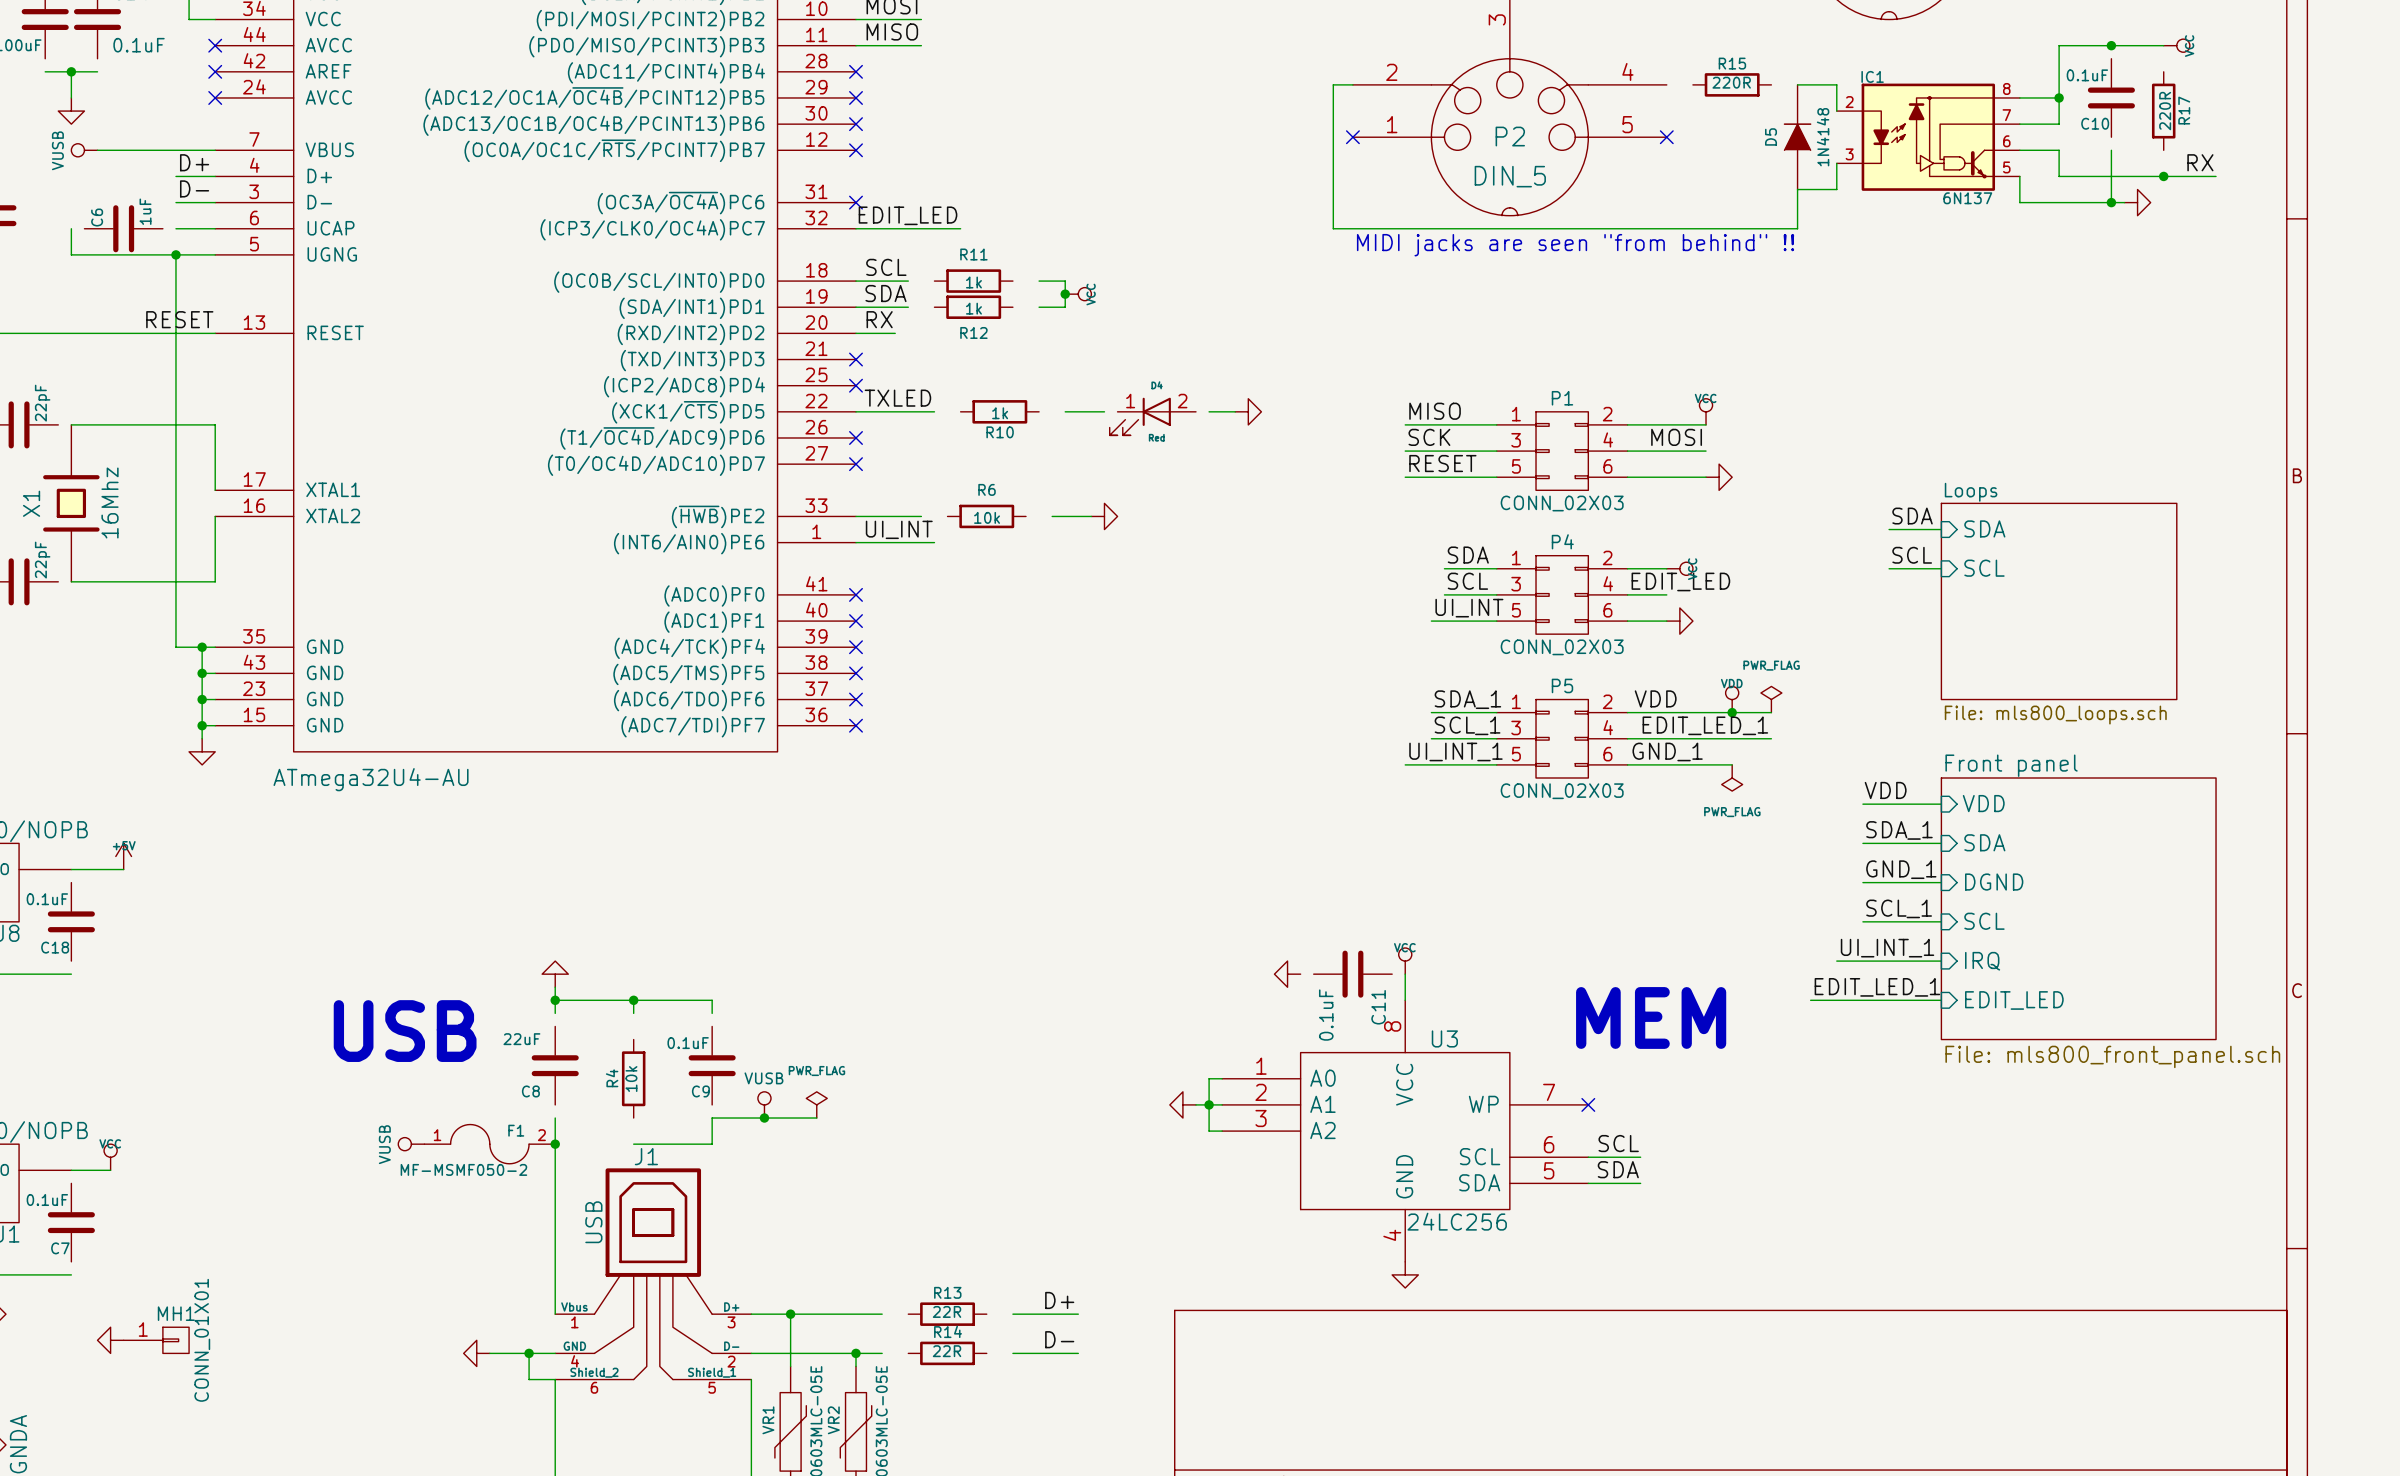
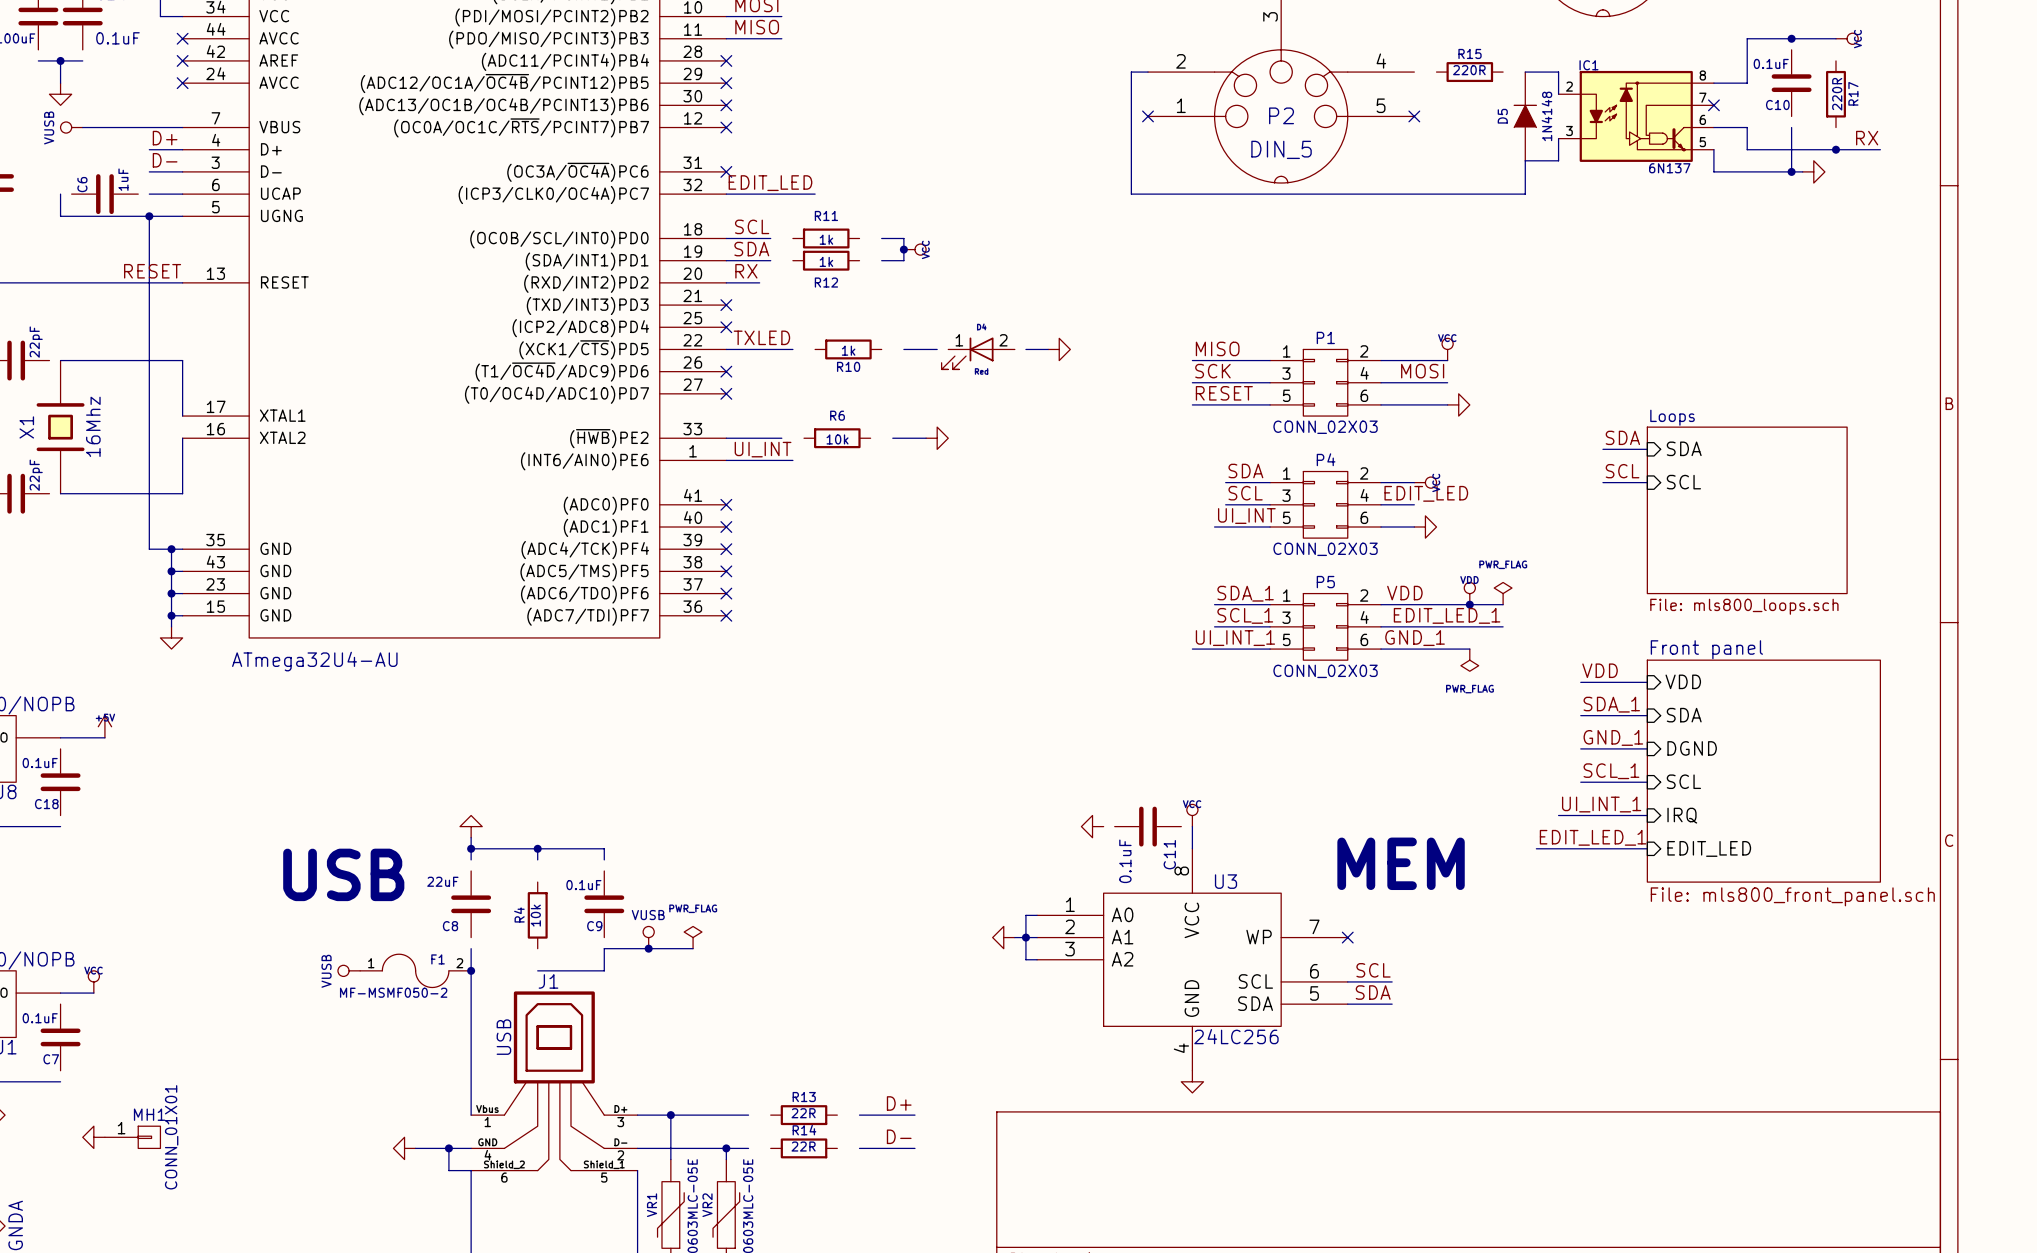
wire: (2059, 97) (2059, 124) (2019, 124) -> none
junction: (2059, 97) -> none
no-connect mark: none -> (1713, 105)
text: MIDI jacks are seen "from behind" !! (1575, 245) -> none

